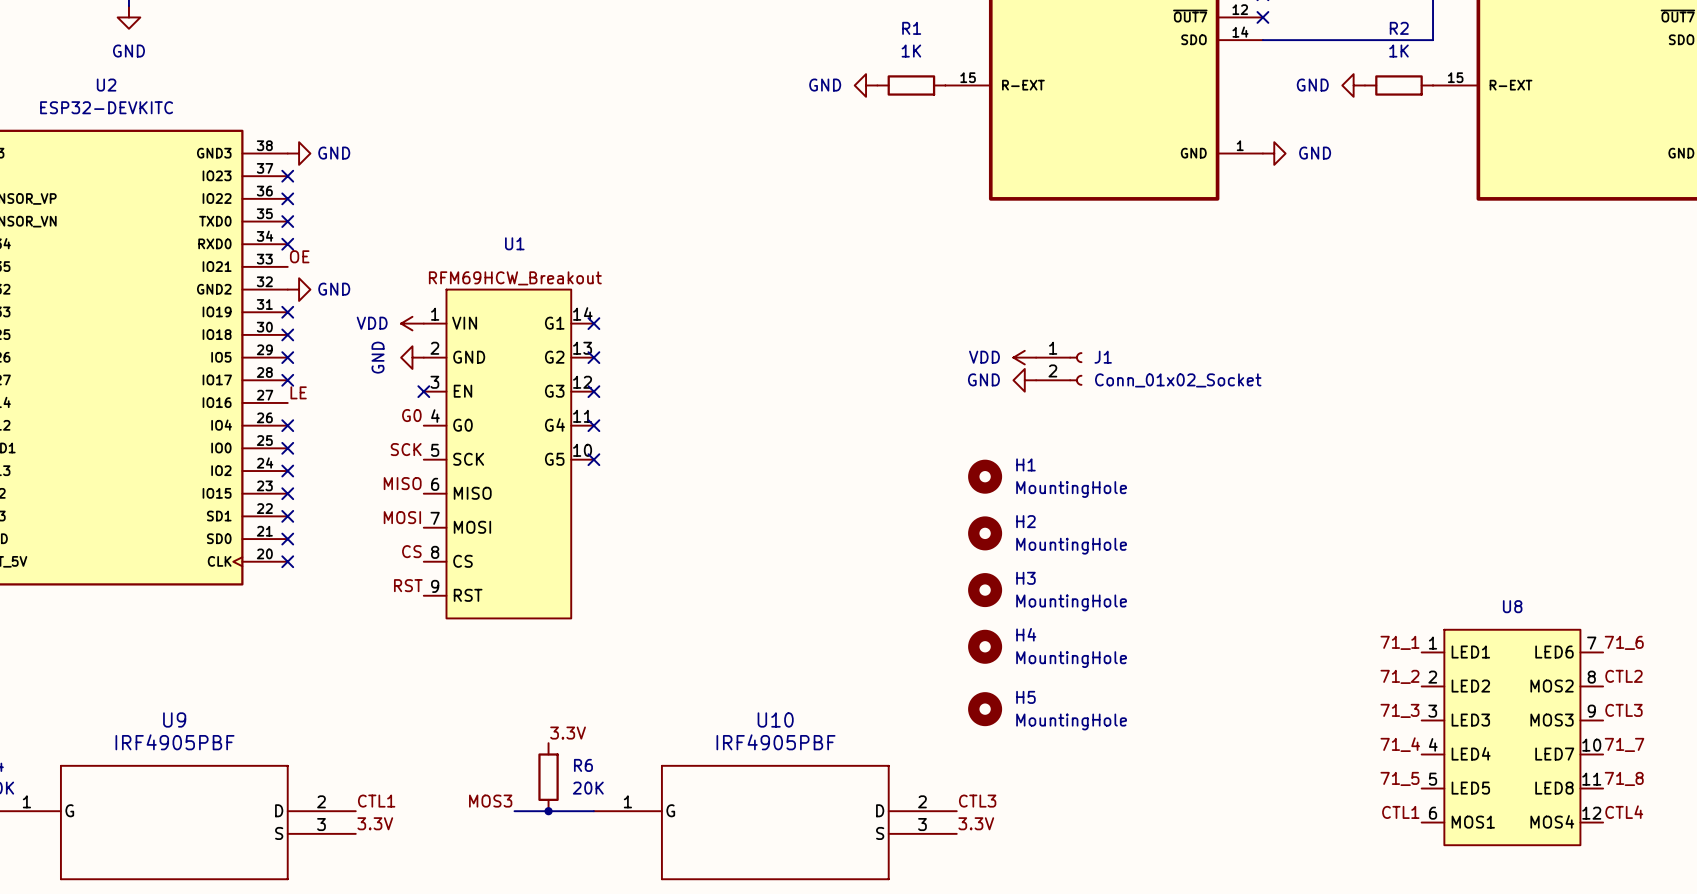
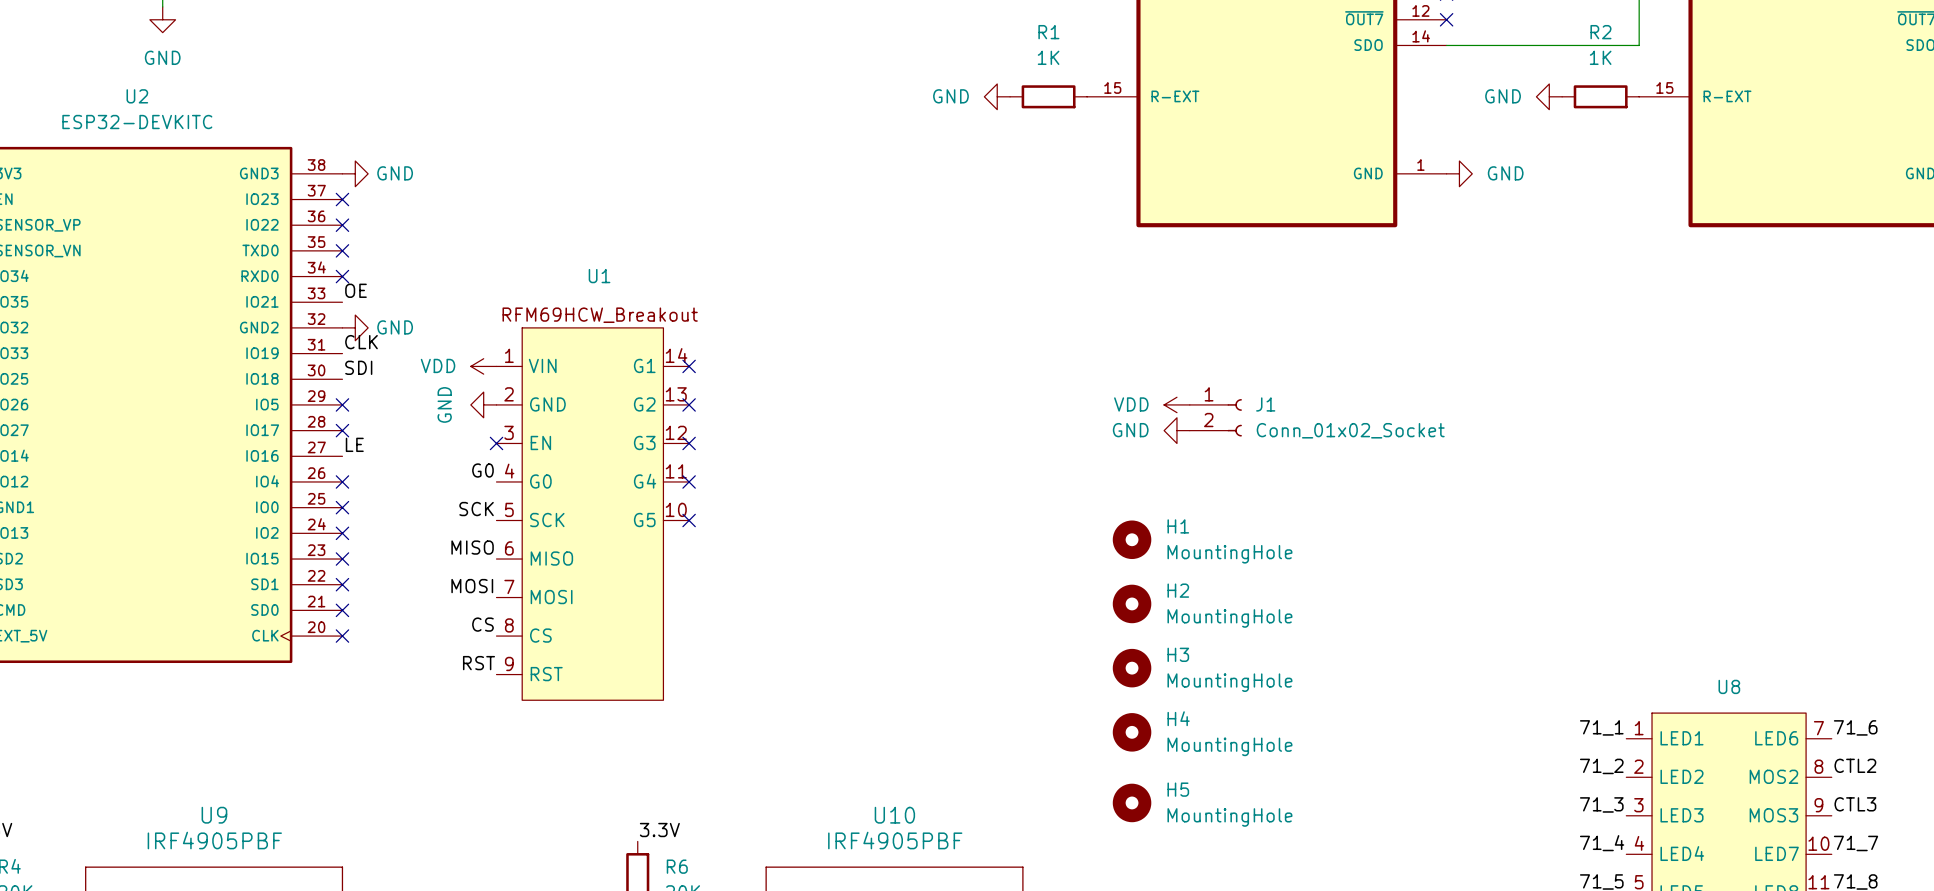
label: none -> CLK (361, 342)
no-connect mark: (287, 312) -> none
label: none -> SDI (358, 367)
no-connect mark: (287, 334) -> none

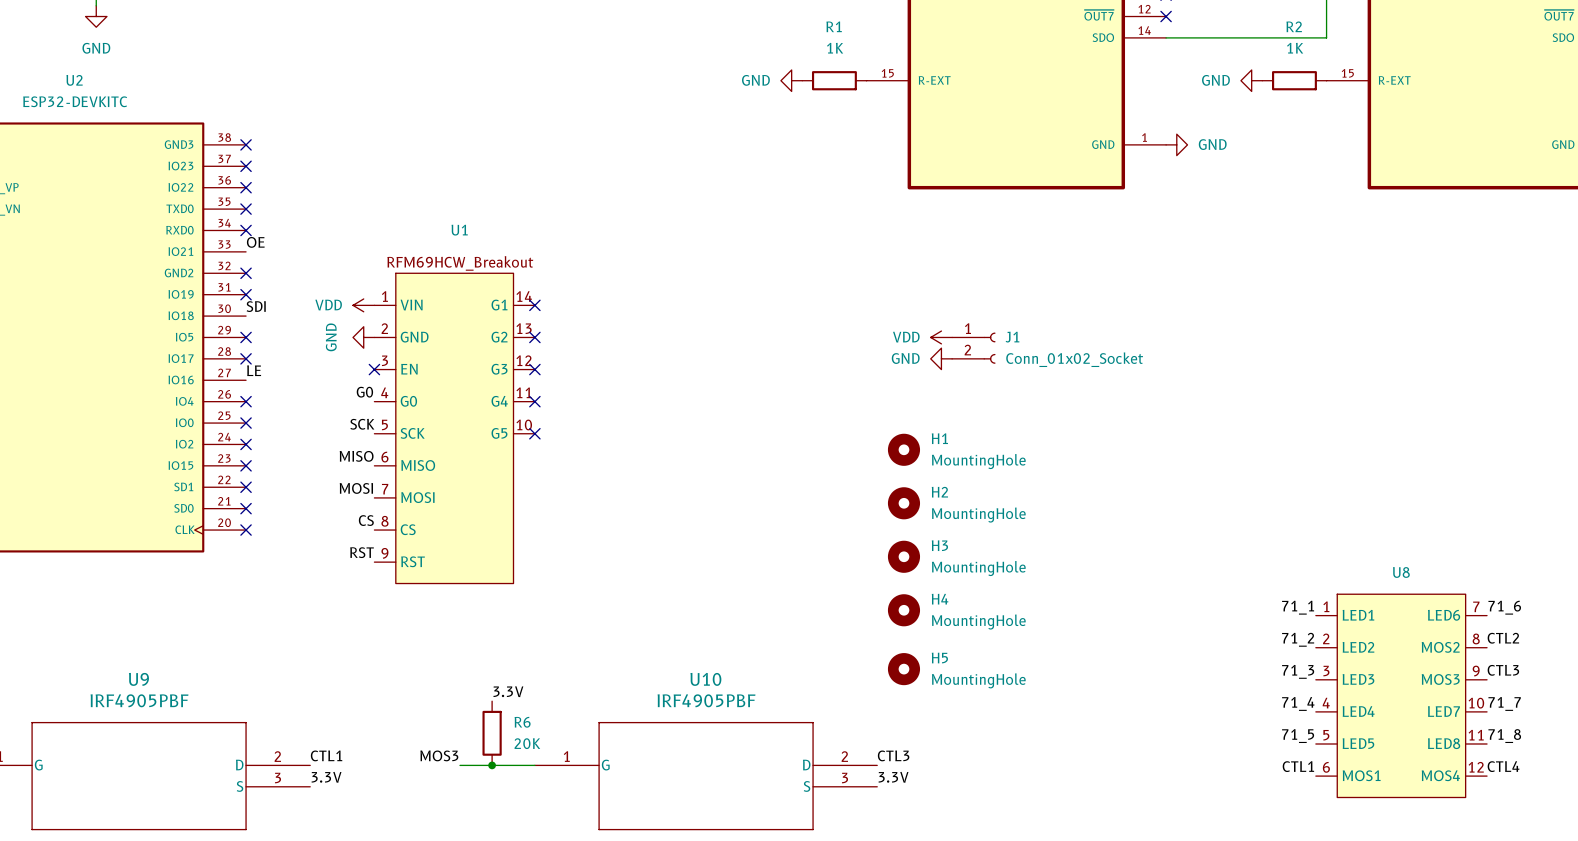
no-connect mark: none -> (246, 144)
power symbol: GND (355, 173) -> none
no-connect mark: none -> (246, 273)
power symbol: GND (355, 327) -> none
label: CLK (361, 342) -> none
no-connect mark: none -> (246, 294)

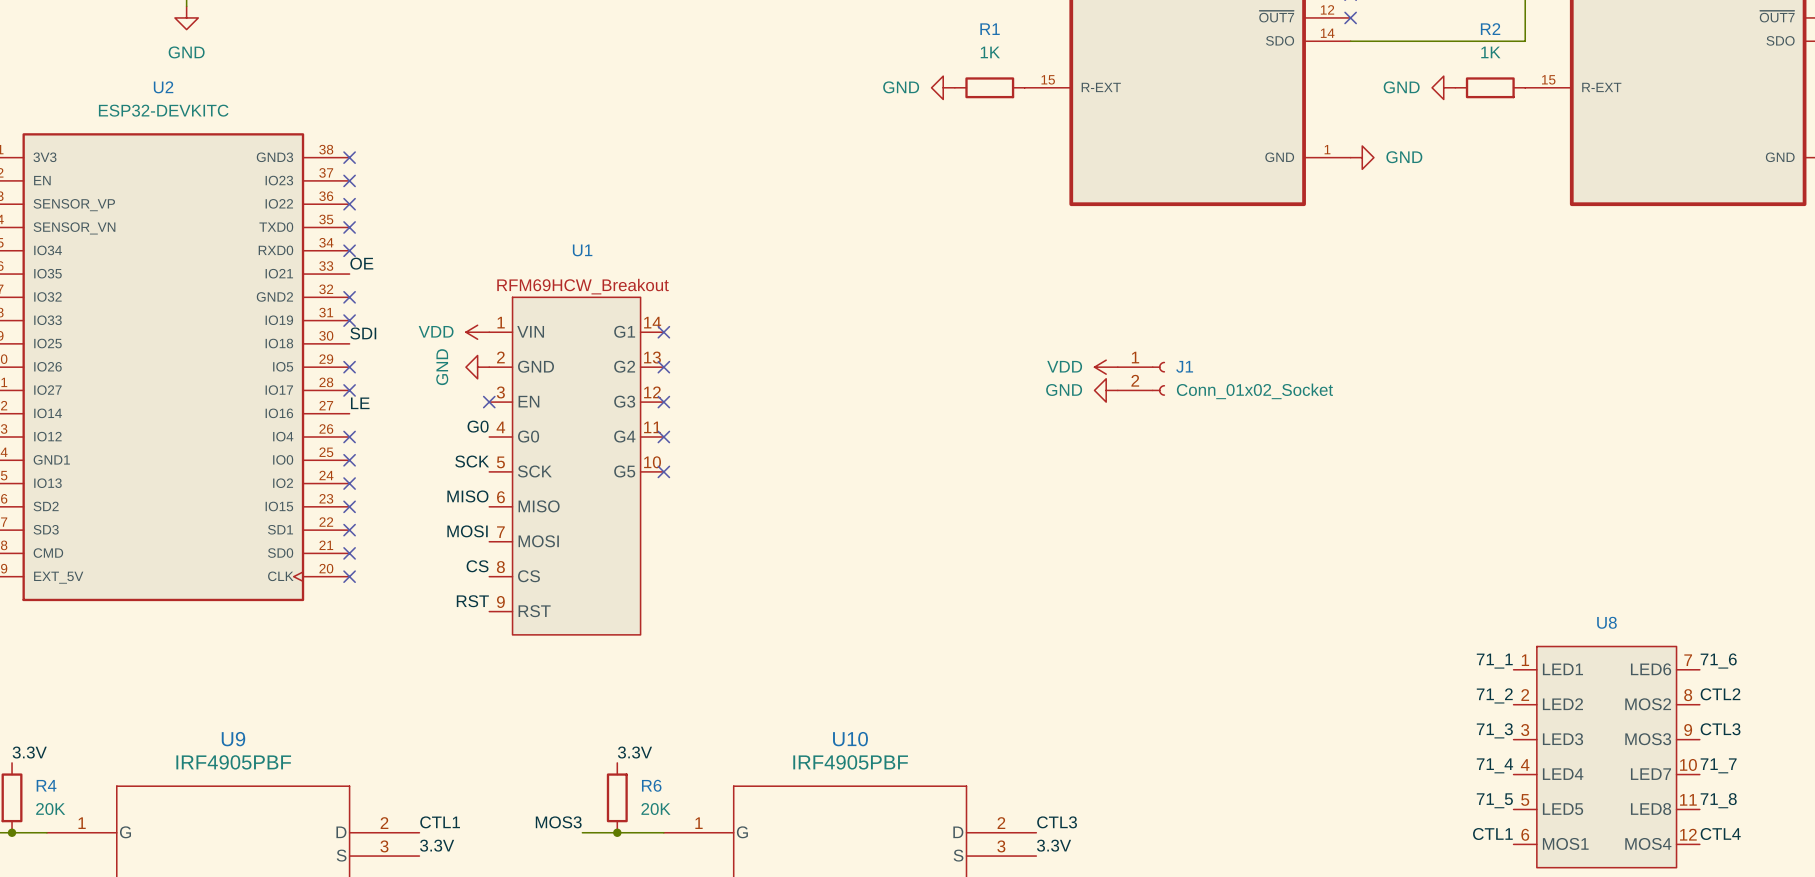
H1: MountingHole (903, 449) -> none
H2: MountingHole (903, 503) -> none
H3: MountingHole (903, 556) -> none
H4: MountingHole (903, 610) -> none
H5: MountingHole (903, 669) -> none

